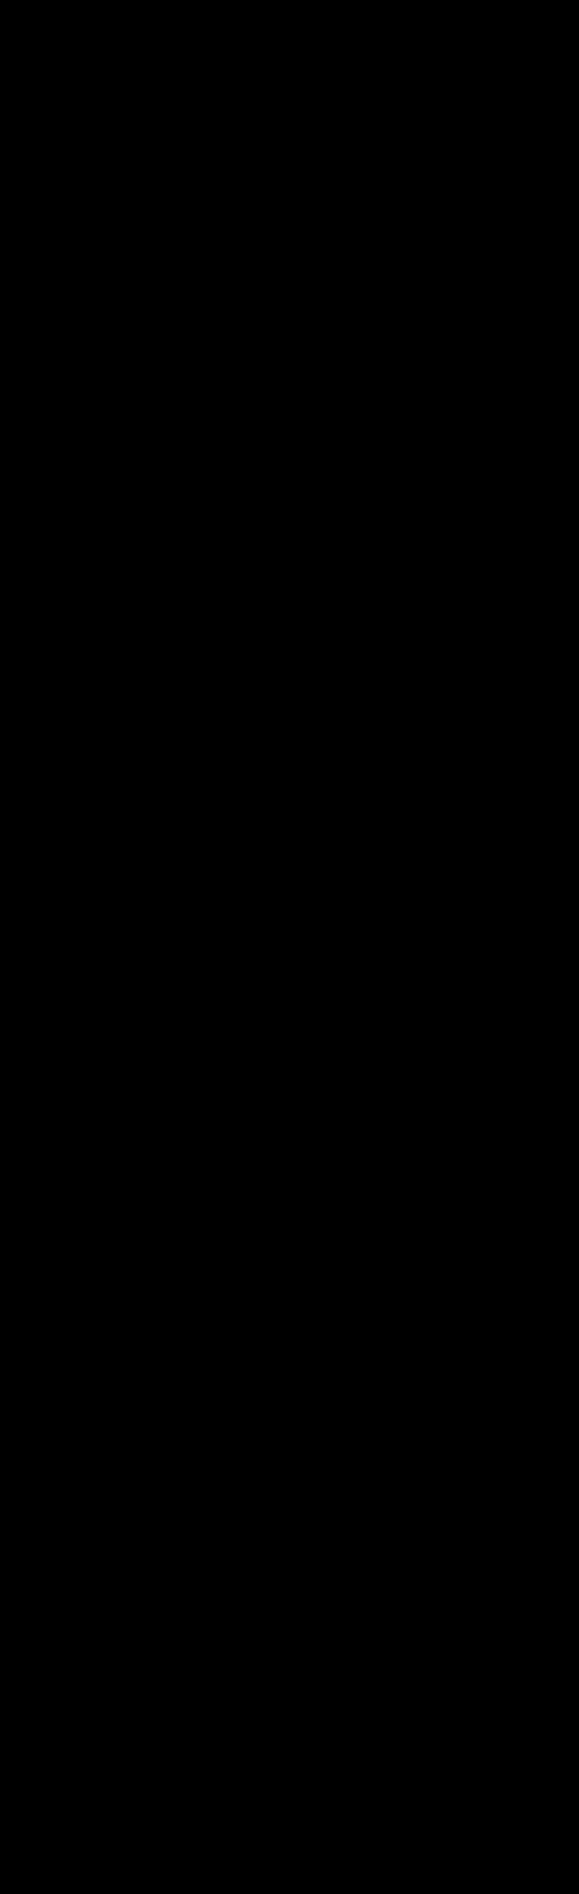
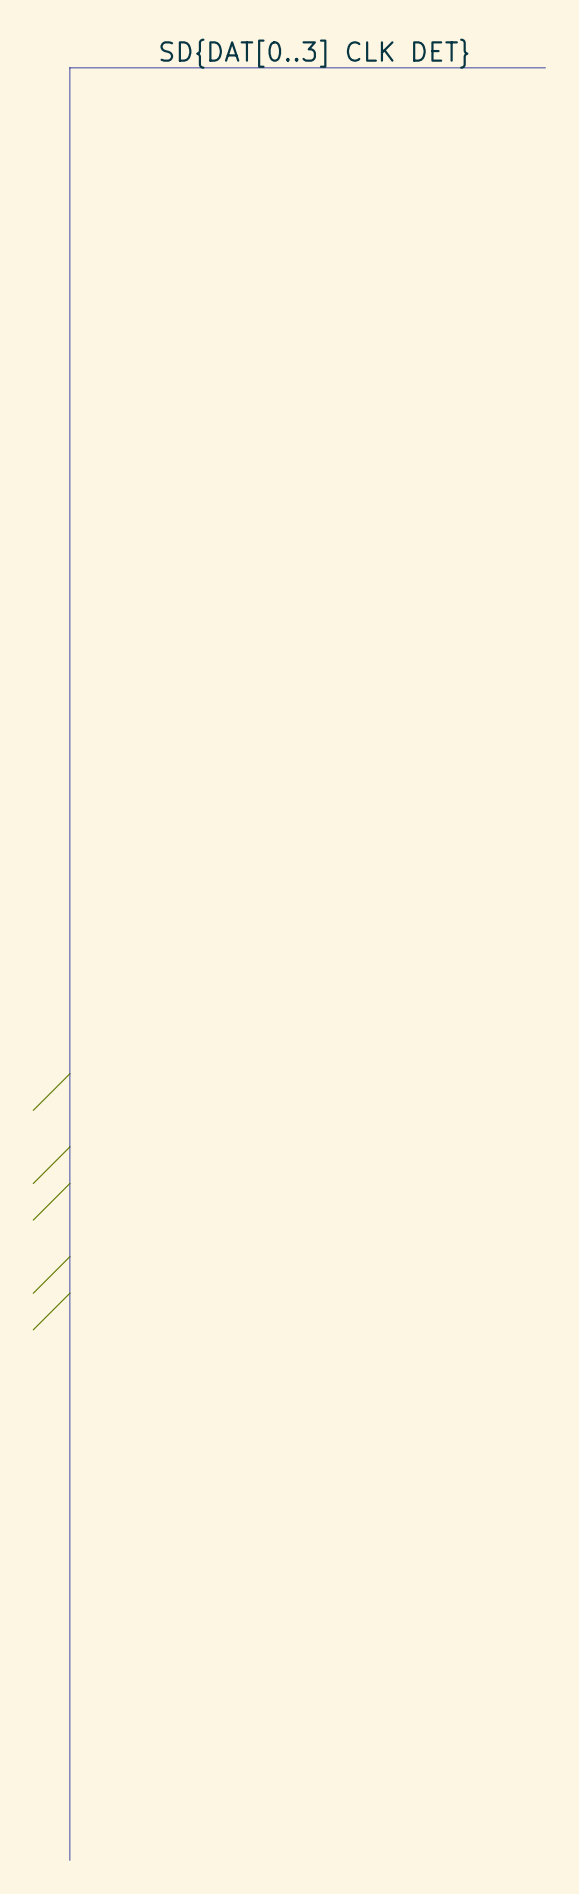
label: none -> SD{DAT[0..3] CLK DET} (314, 53)
bus: none -> (545, 67) (69, 67) (69, 1860)
wire: none -> (69, 1073) (33, 1110)
wire: none -> (69, 1146) (33, 1183)
wire: none -> (69, 1183) (33, 1220)
wire: none -> (69, 1256) (33, 1293)
wire: none -> (69, 1293) (33, 1329)

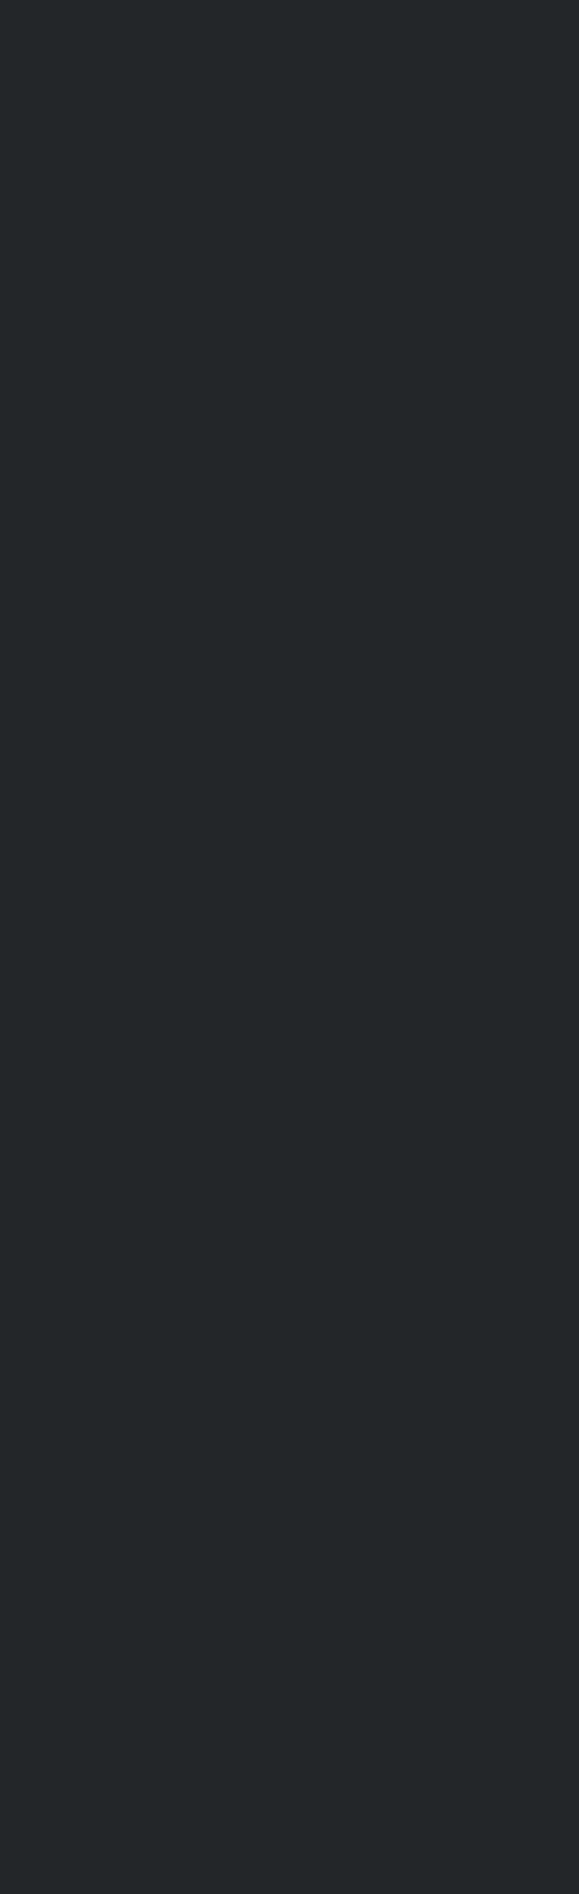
label: SD{DAT[0..3] CLK DET} (314, 53) -> none
bus: (545, 67) (69, 67) (69, 1860) -> none
wire: (69, 1073) (33, 1110) -> none
wire: (69, 1146) (33, 1183) -> none
wire: (69, 1183) (33, 1220) -> none
wire: (69, 1256) (33, 1293) -> none
wire: (69, 1293) (33, 1329) -> none

